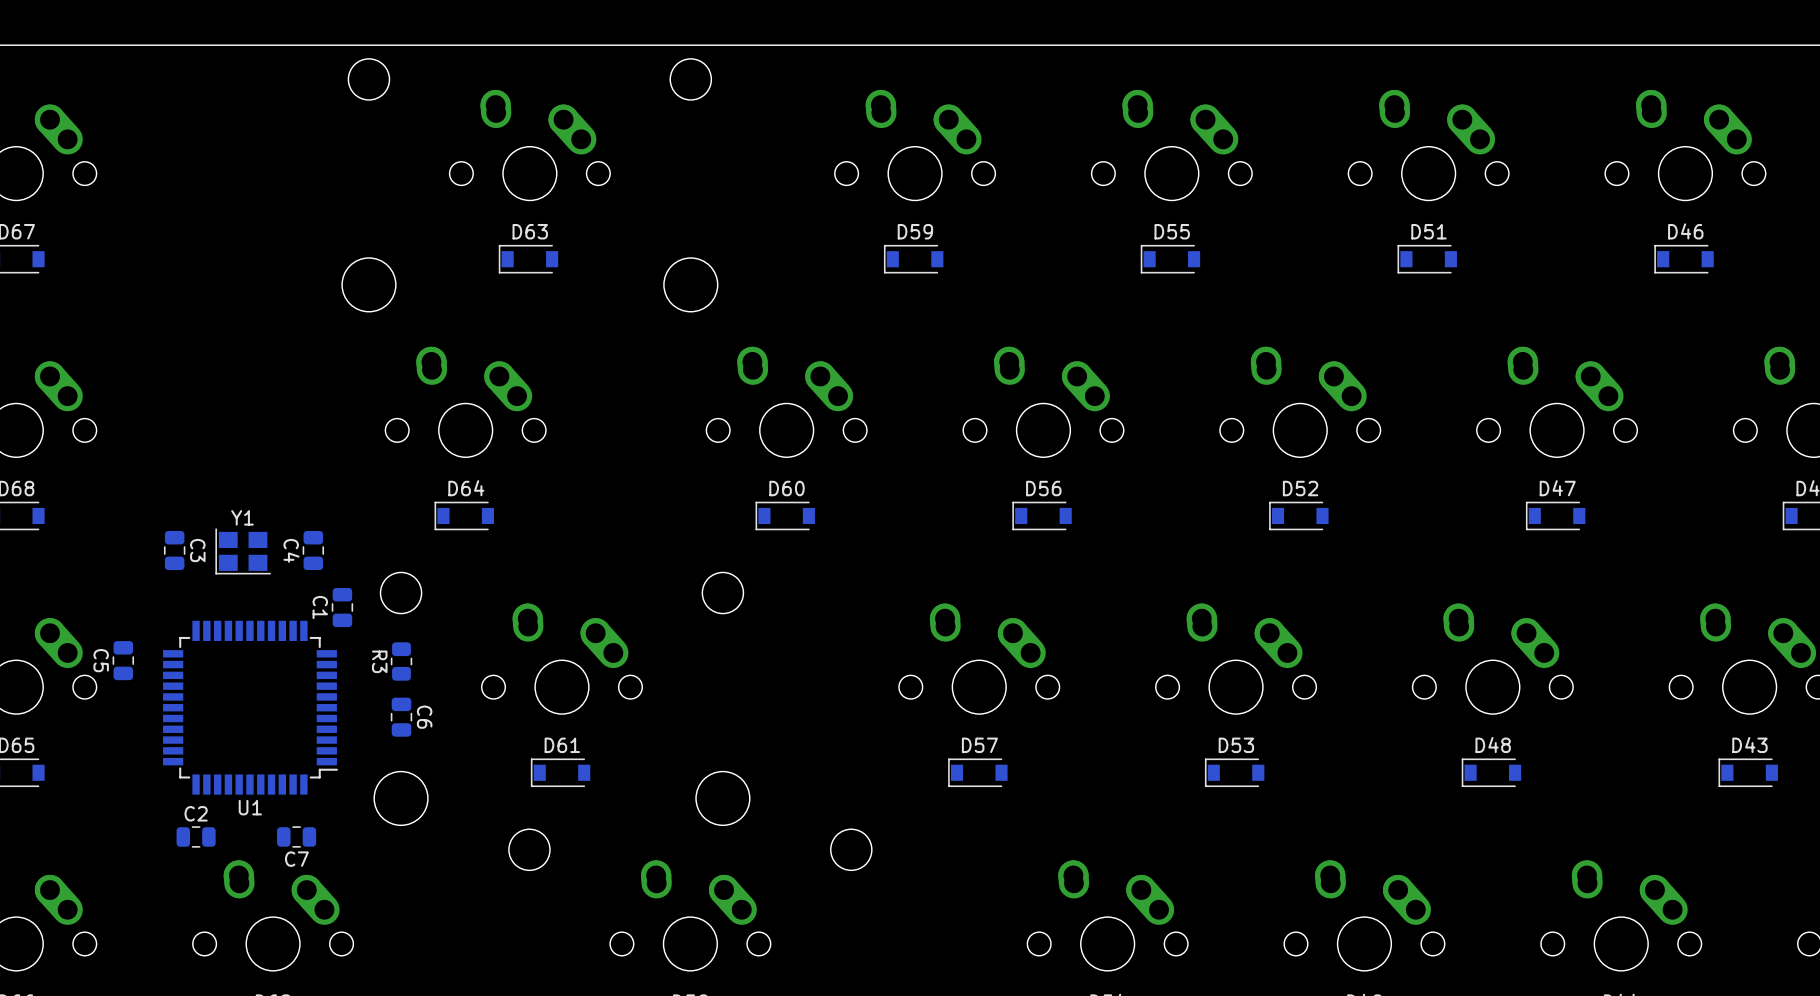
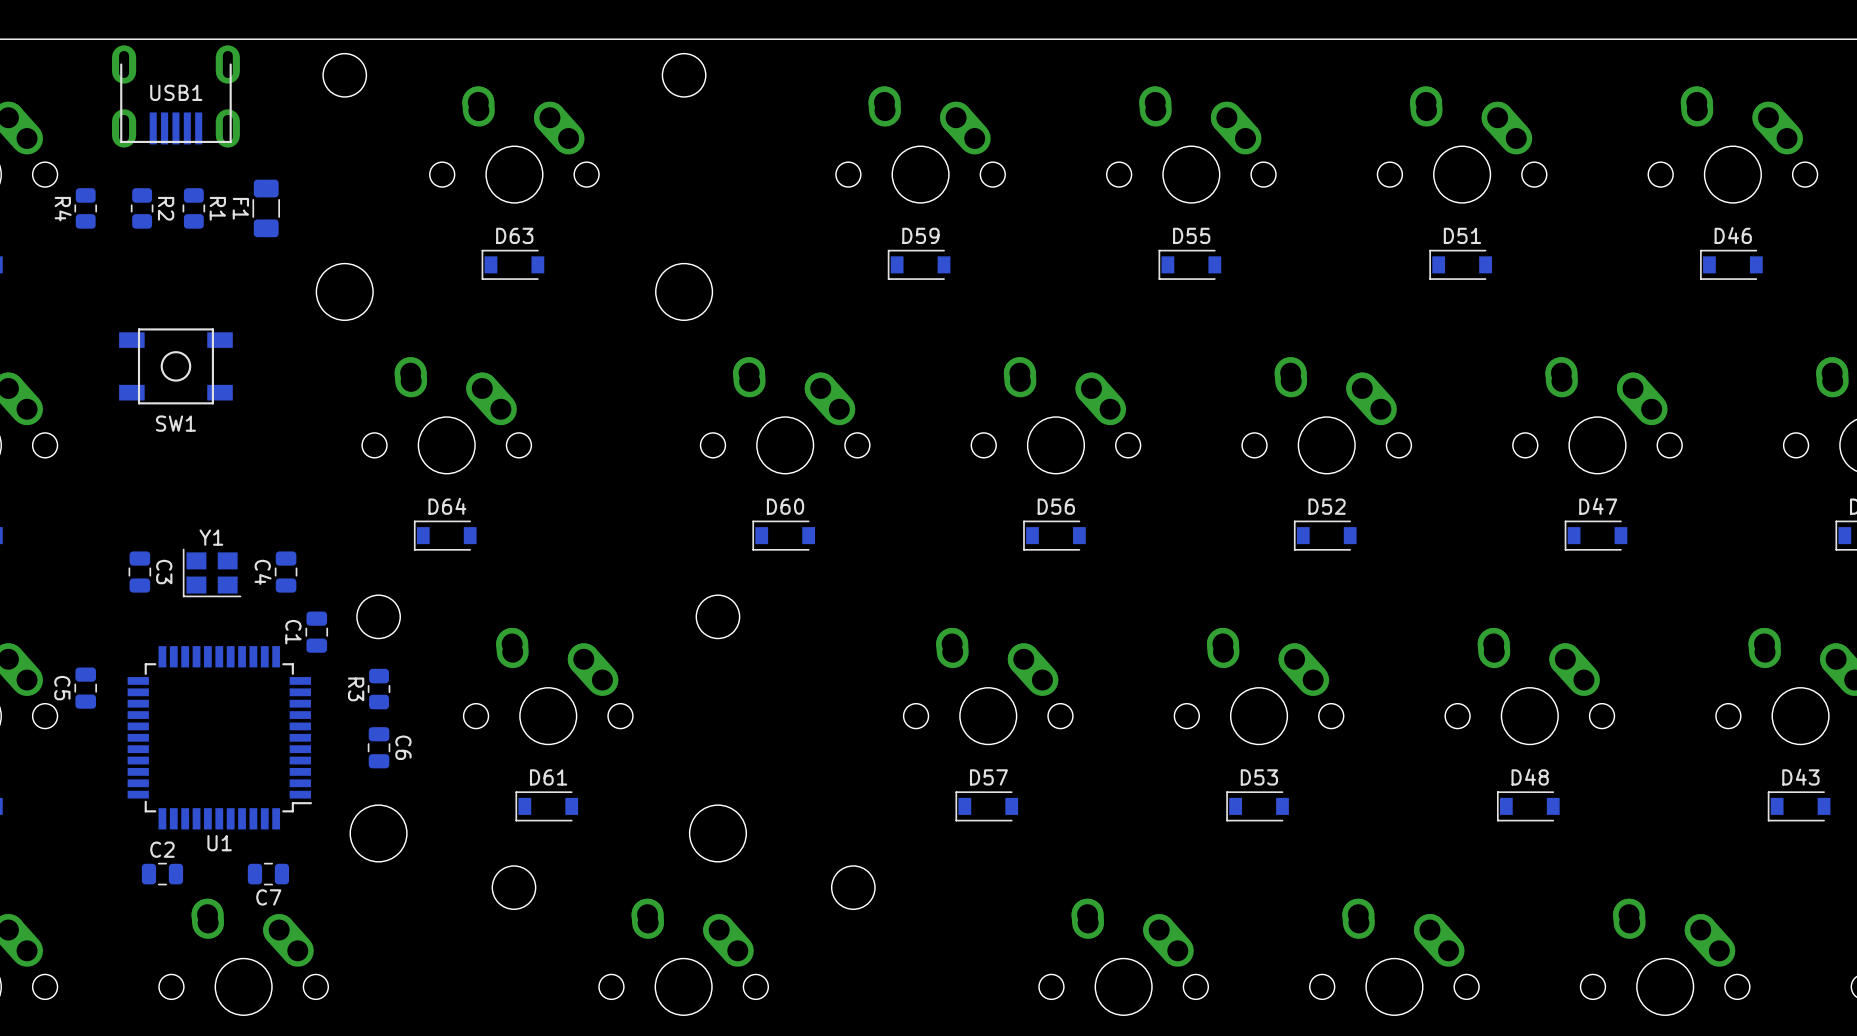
USB1: none -> (175, 96)
R4: none -> (85, 208)
R2: none -> (142, 208)
R1: none -> (193, 208)
F1: none -> (266, 208)
SW1: none -> (175, 366)

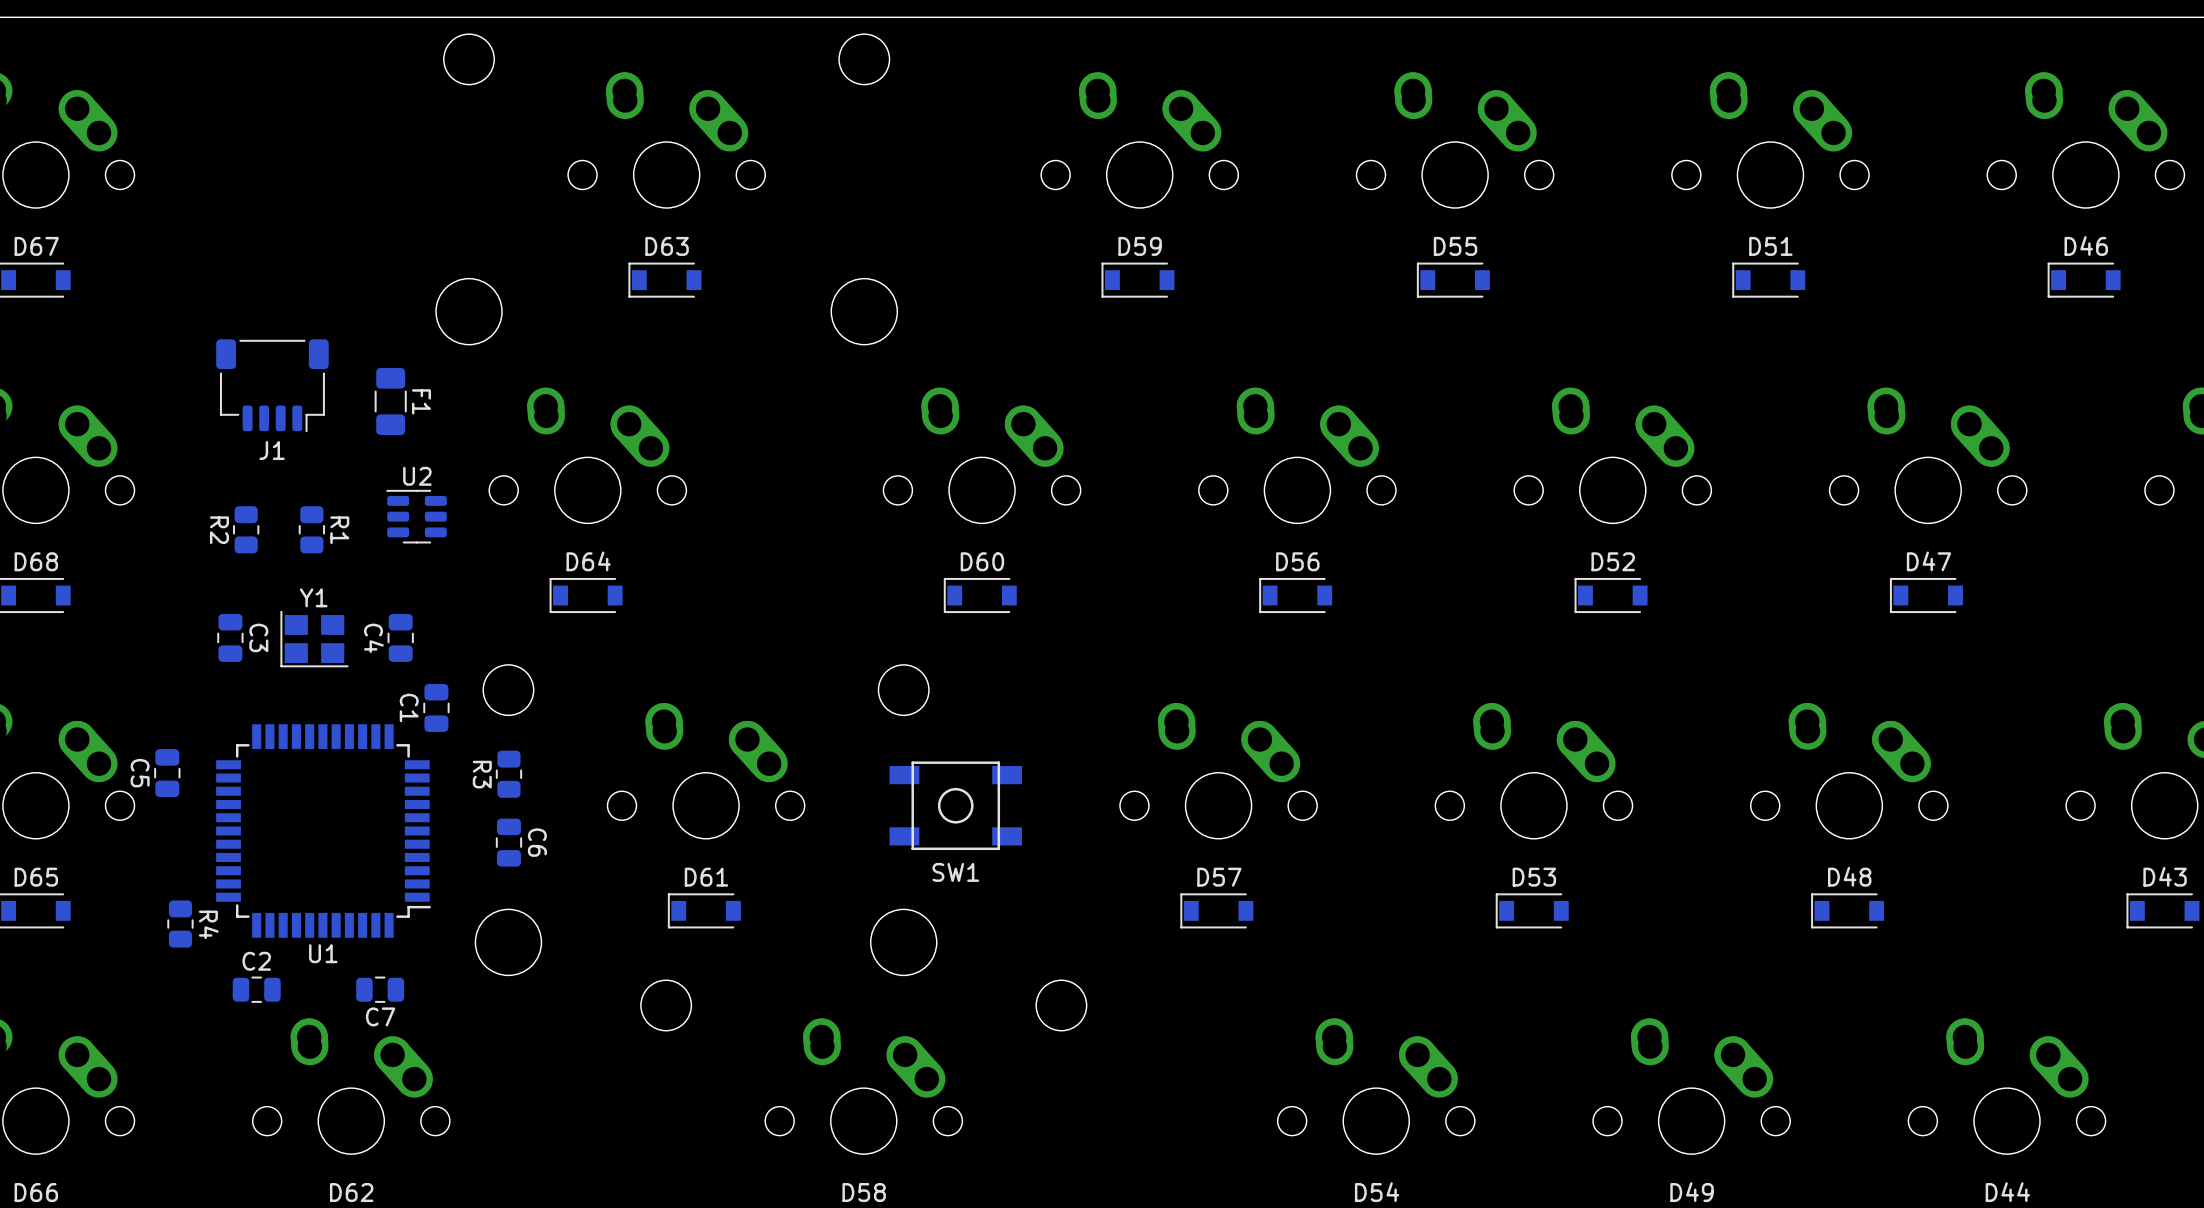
USB1: (175, 96) -> none
R4 position: (85, 208) -> (180, 924)
R2 position: (142, 208) -> (246, 529)
R2 name position: R2 (166, 208) -> R2 (219, 530)
R1 position: (193, 208) -> (311, 529)
F1 name position: F1 (240, 208) -> F1 (421, 401)
F1 position: (266, 208) -> (390, 401)
R4 name position: R4 (63, 209) -> R4 (208, 924)
J1: none -> (272, 385)
SW1 position: (175, 366) -> (955, 805)
U2: none -> (416, 516)

